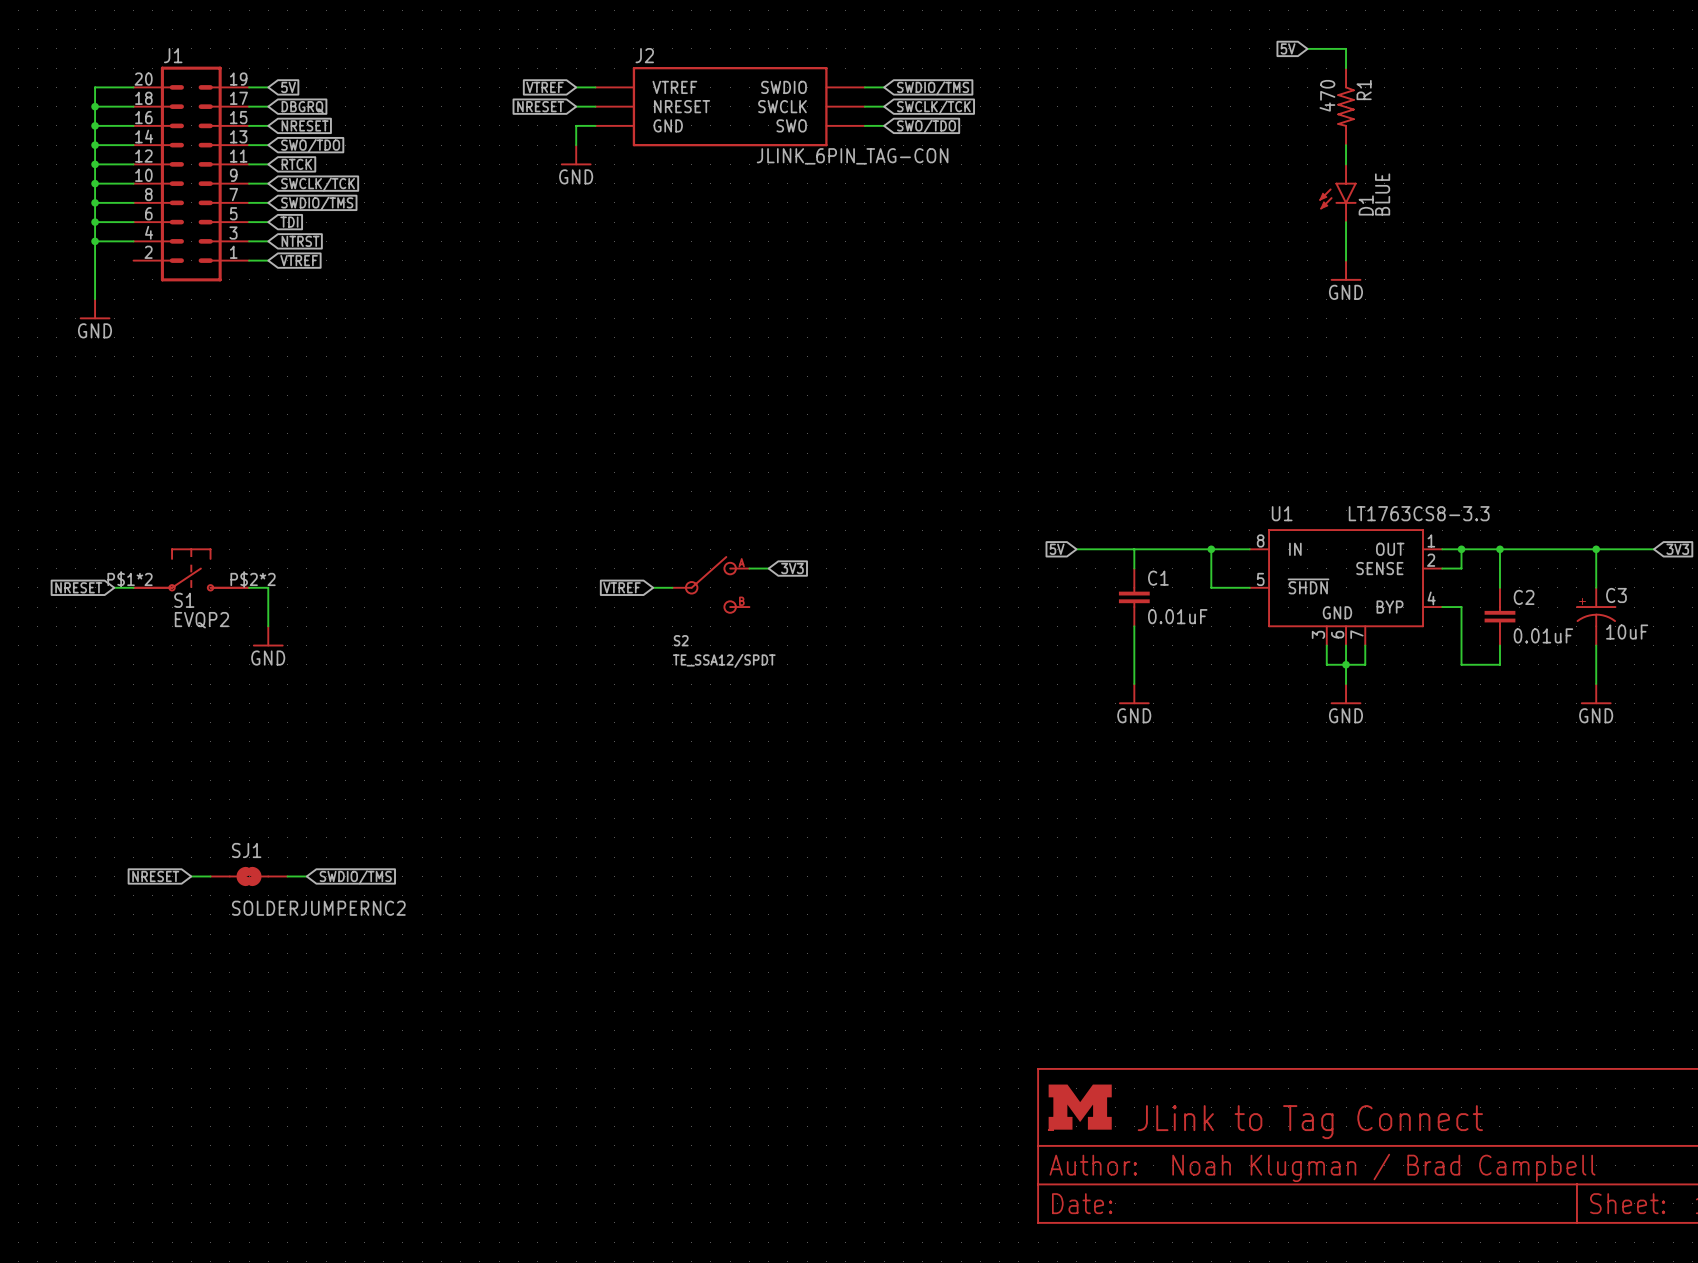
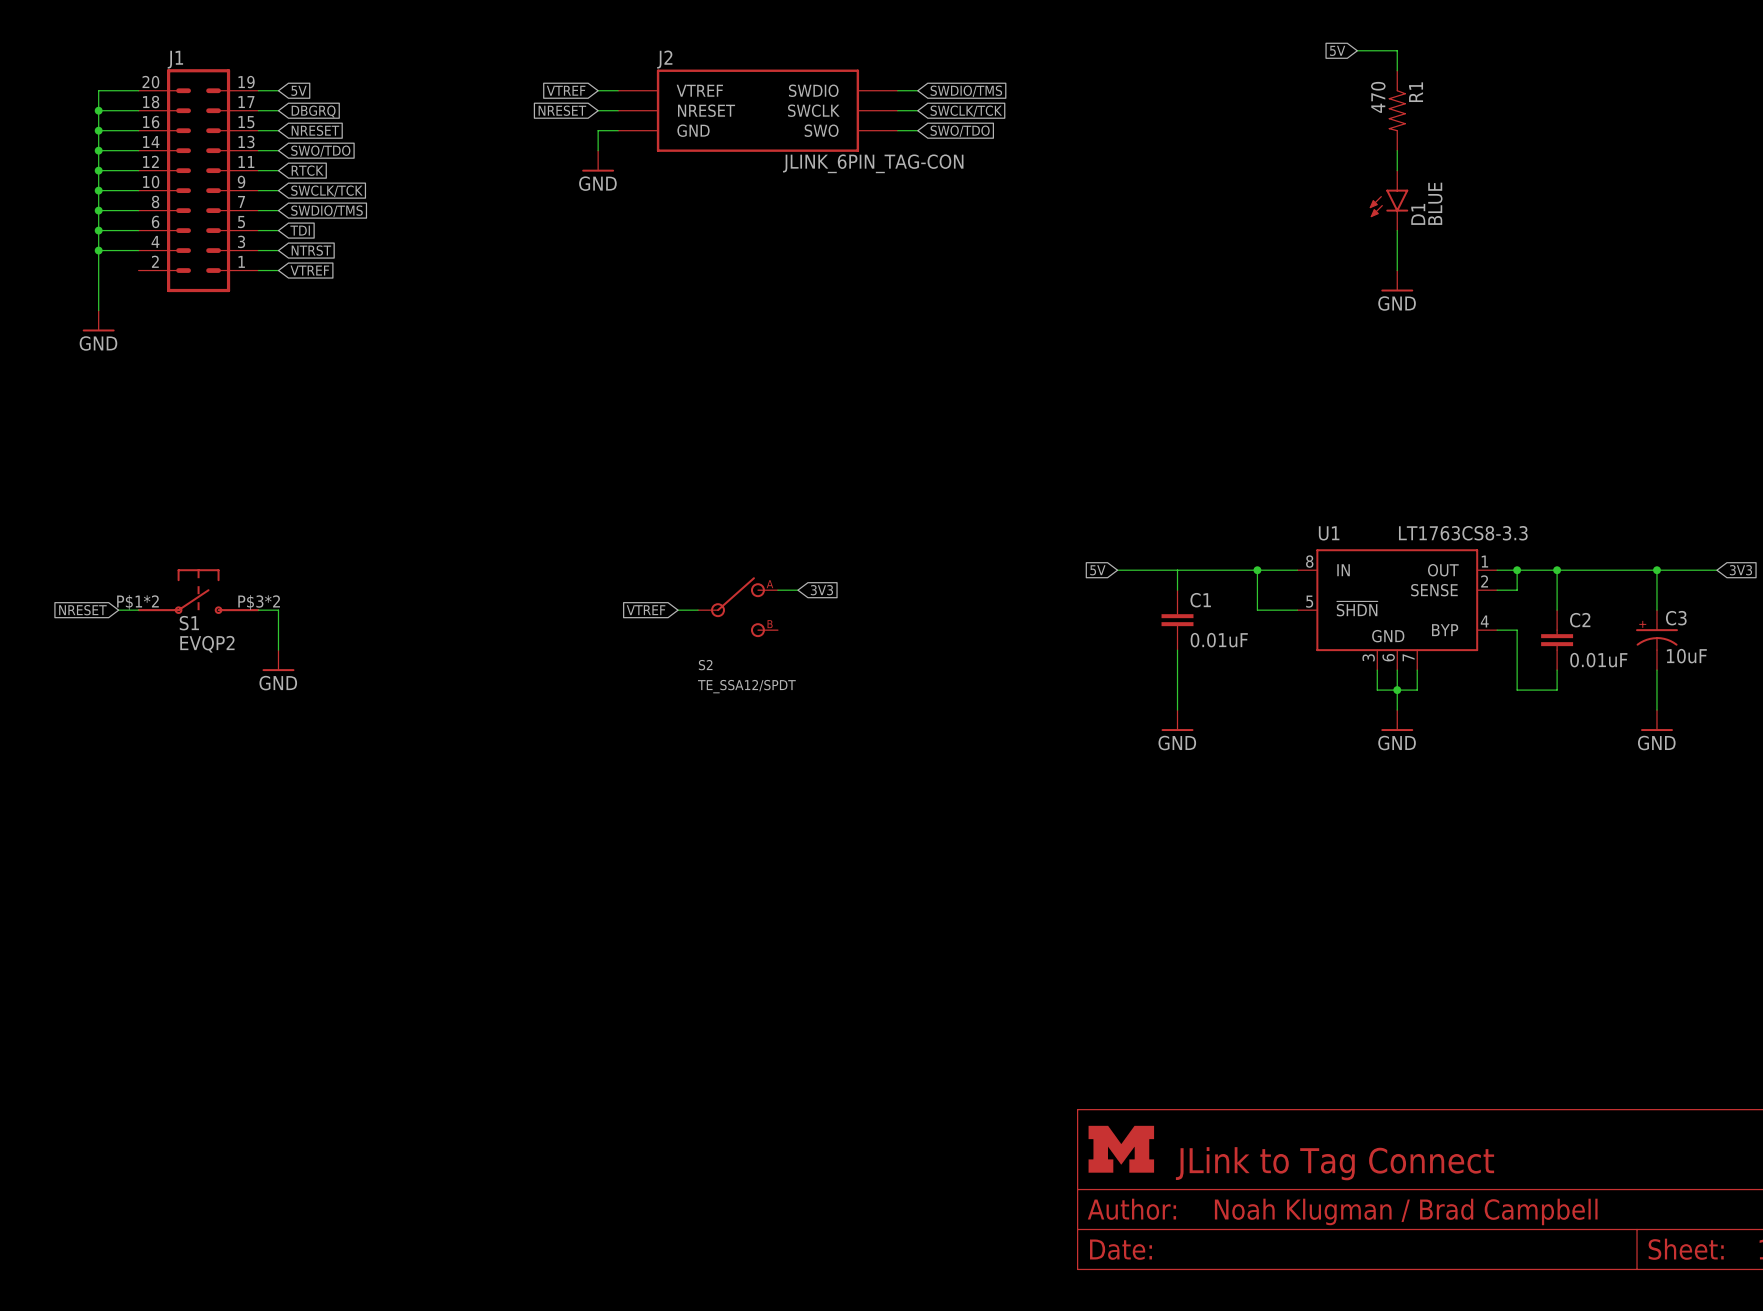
S1 pin number: P$2*2 (253, 579) -> P$3*2 (259, 602)
global label: NRESET (155, 876) -> none
wire: (191, 876) (210, 876) -> none
SJ1: SOLDERJUMPERNC2 (249, 876) -> none
wire: (287, 876) (306, 876) -> none
global label: SWDIO/TMS (355, 877) -> none

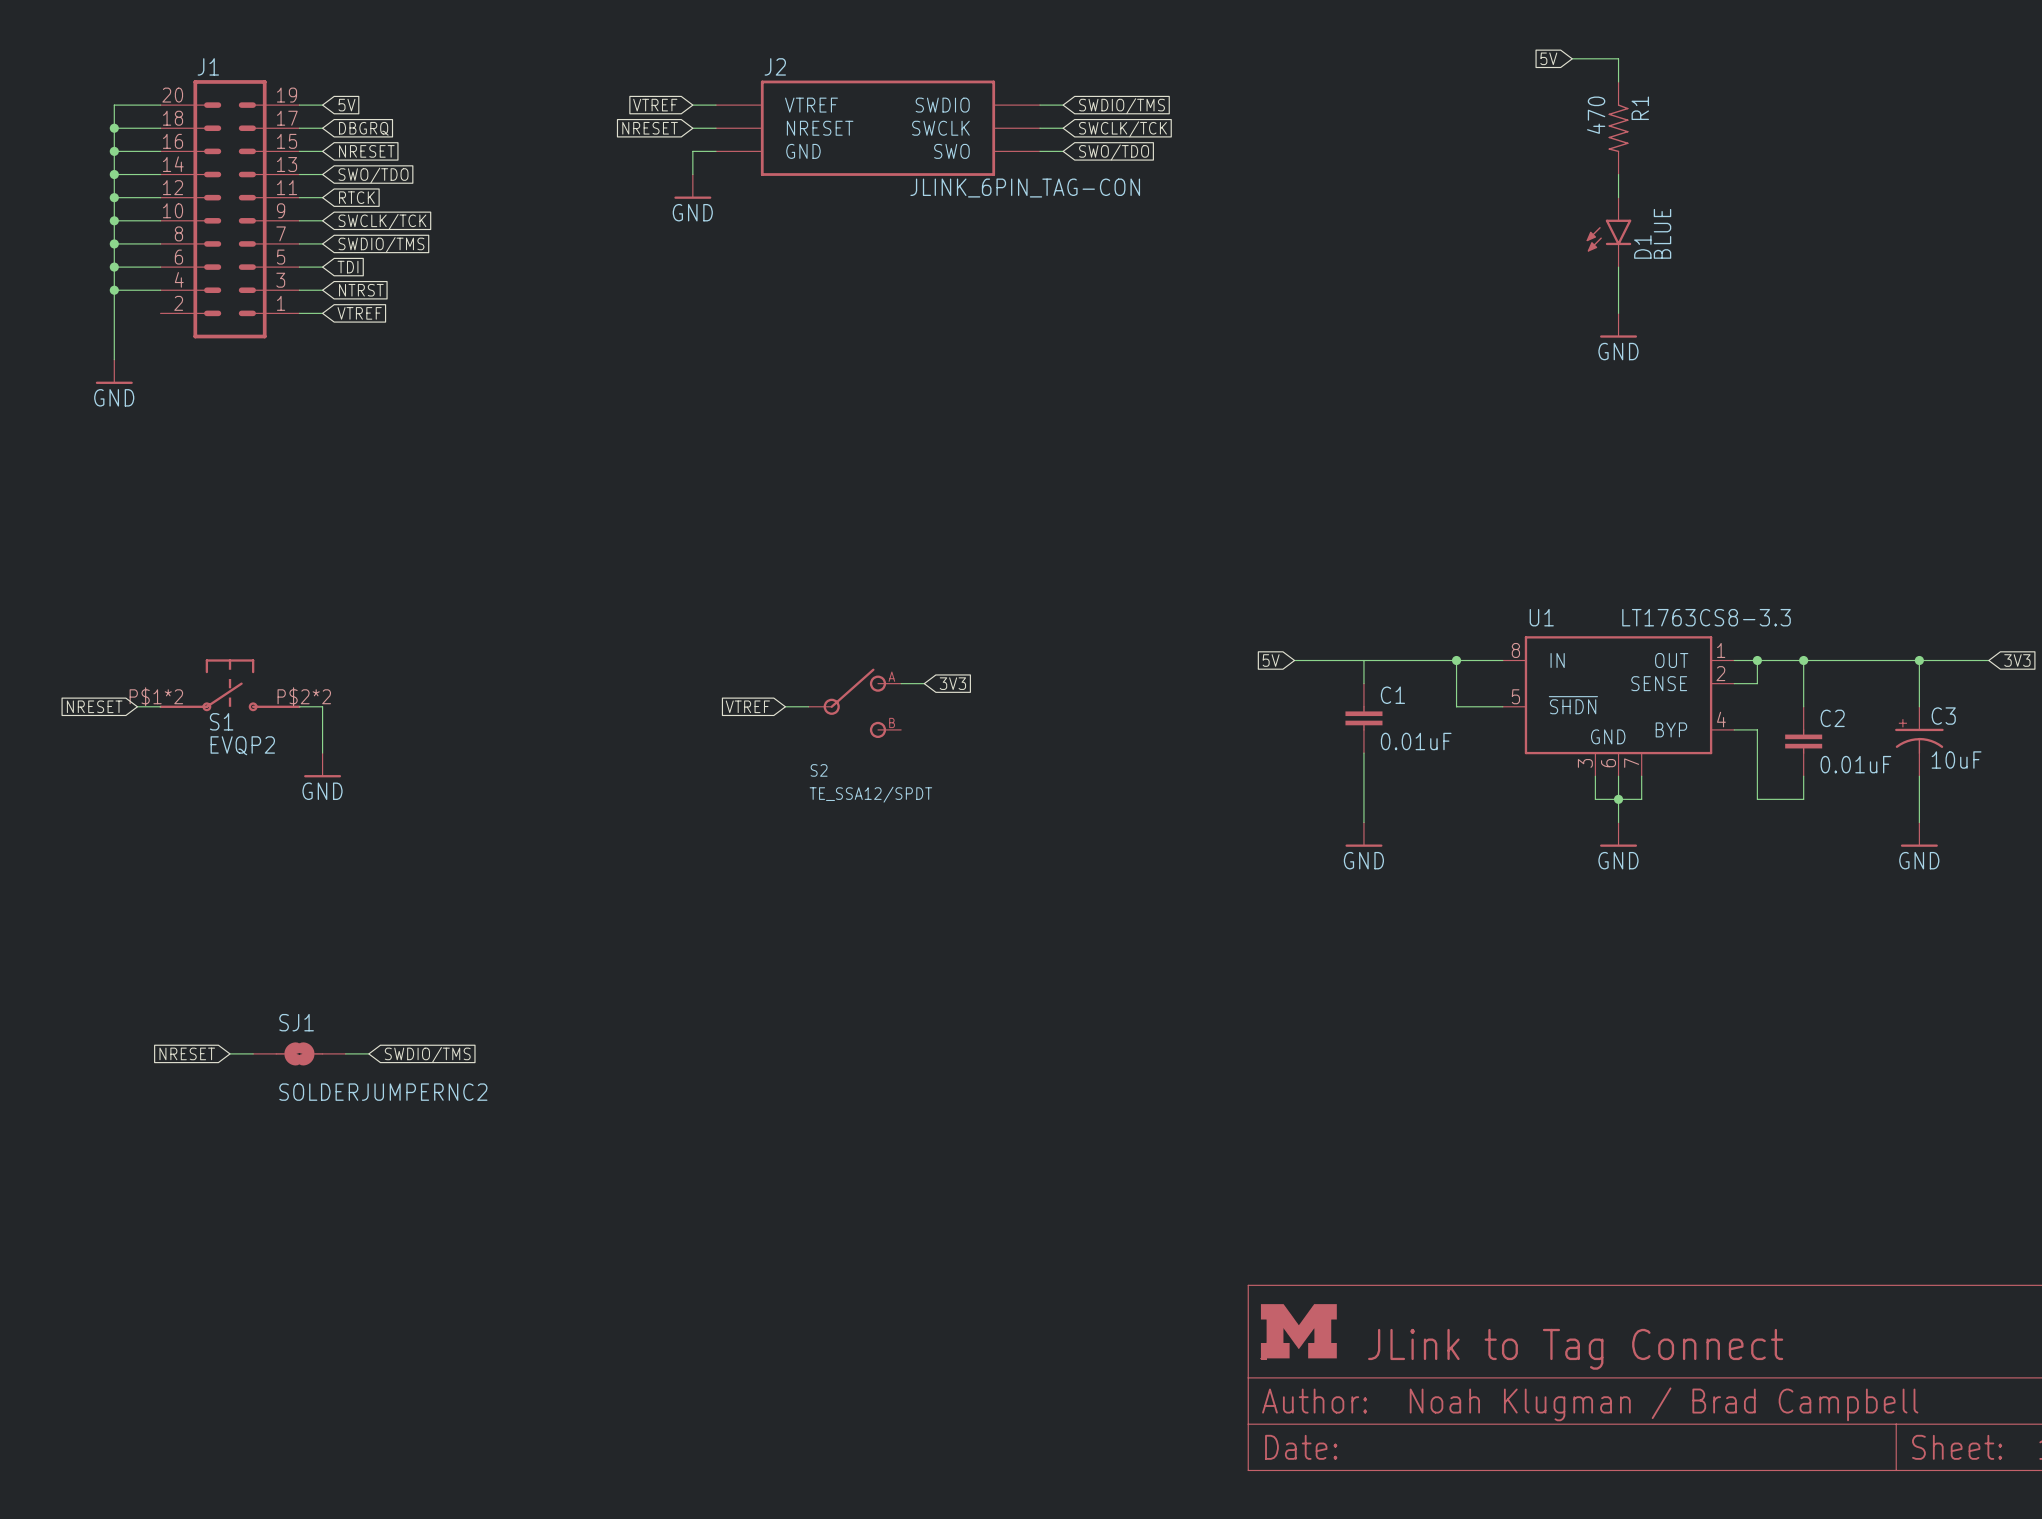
S1 pin number: P$3*2 (259, 602) -> P$2*2 (304, 696)
global label: none -> NRESET (187, 1053)
wire: none -> (230, 1053) (253, 1053)
SJ1: none -> SOLDERJUMPERNC2 (299, 1053)
wire: none -> (345, 1053) (368, 1053)
global label: none -> SWDIO/TMS (427, 1055)

